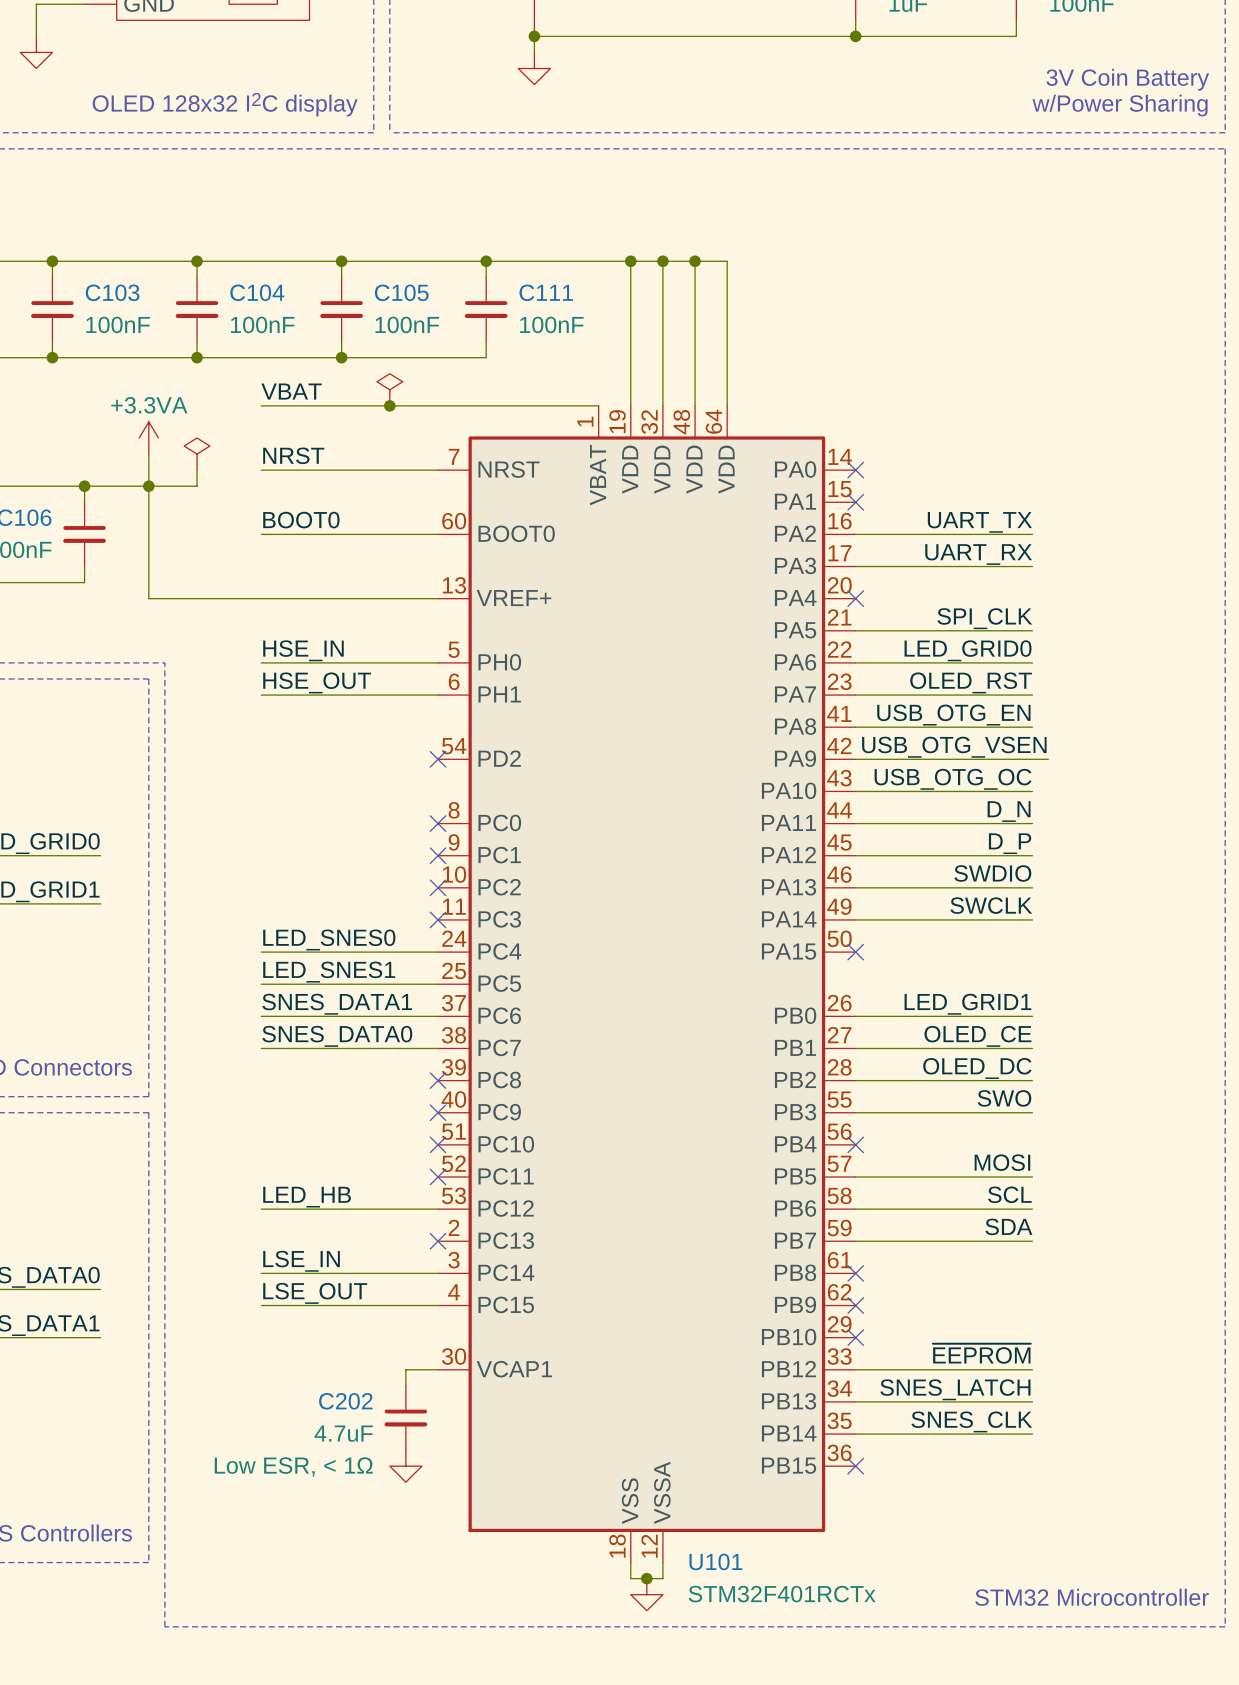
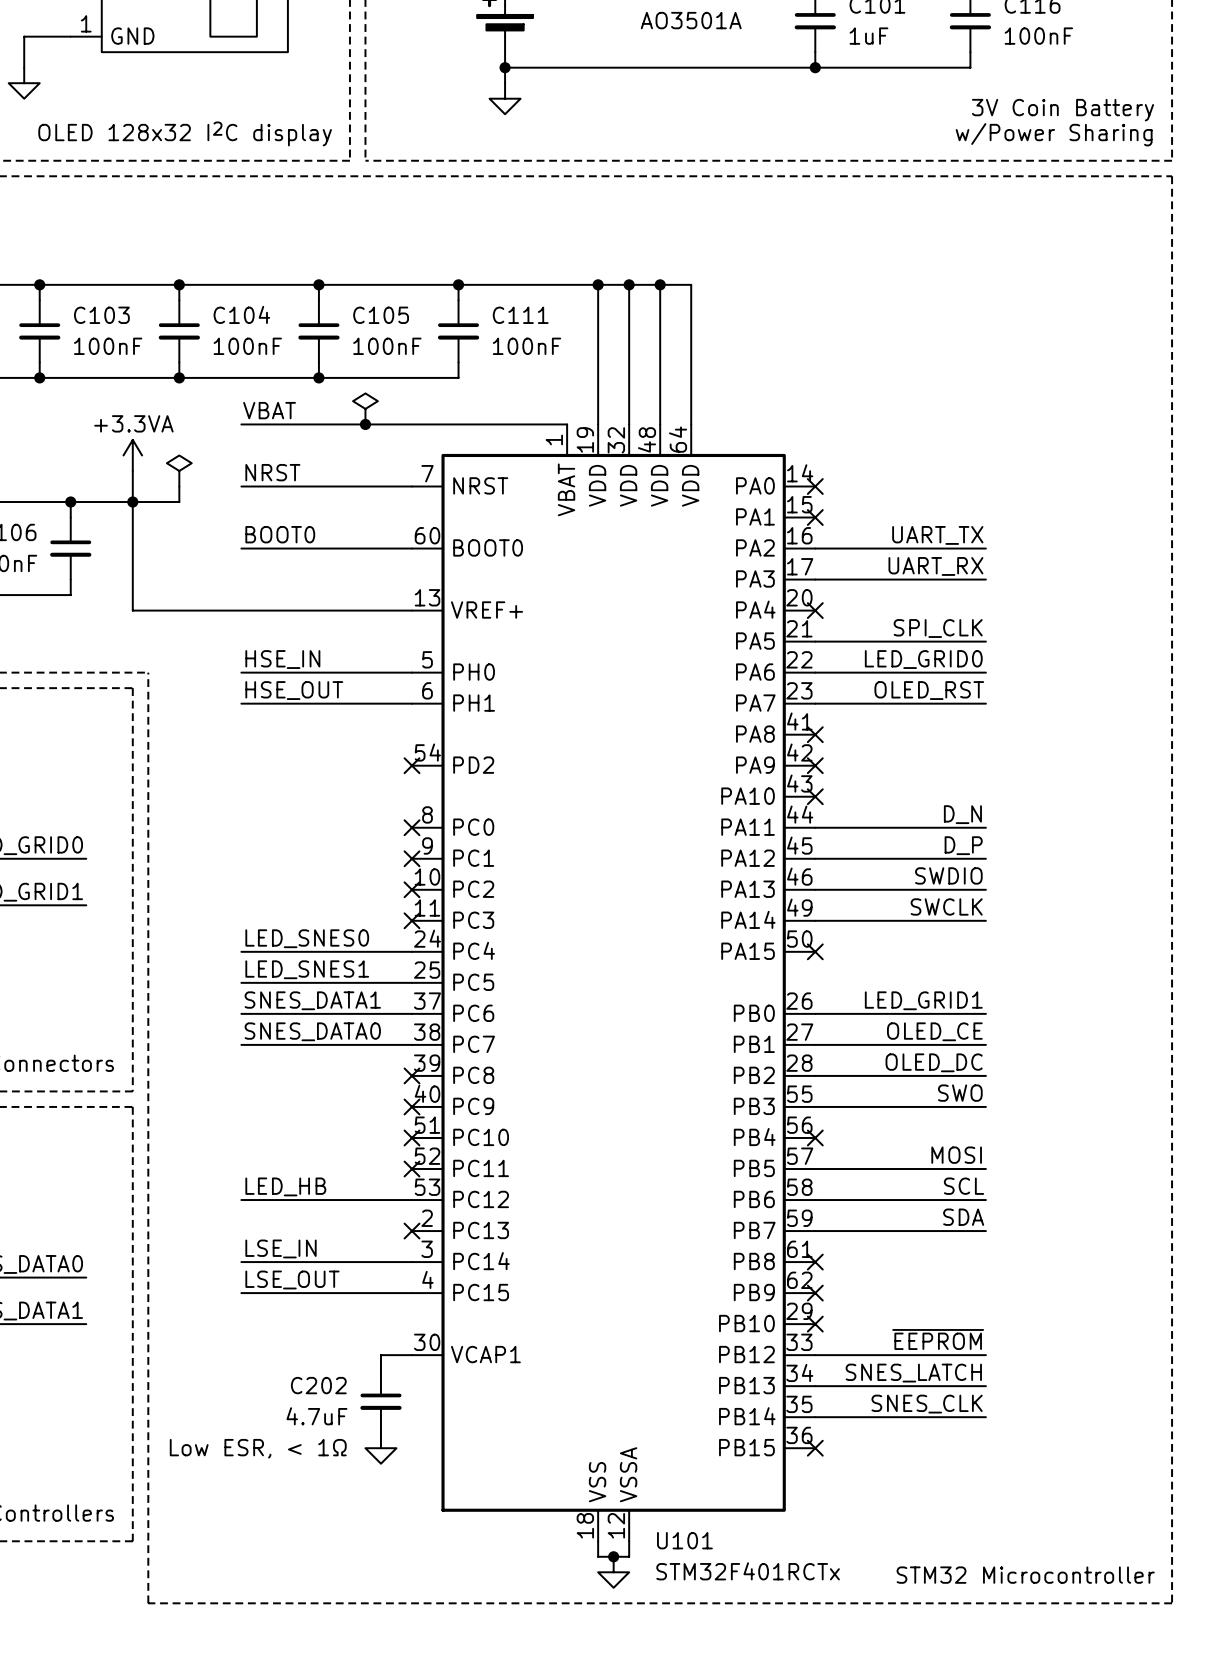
label: USB_OTG_EN (953, 715) -> none
wire: (855, 727) (1032, 727) -> none
no-connect mark: none -> (815, 734)
label: USB_OTG_VSEN (954, 747) -> none
wire: (855, 759) (1048, 759) -> none
no-connect mark: none -> (815, 765)
label: USB_OTG_OC (953, 779) -> none
wire: (855, 791) (1032, 791) -> none
no-connect mark: none -> (815, 796)

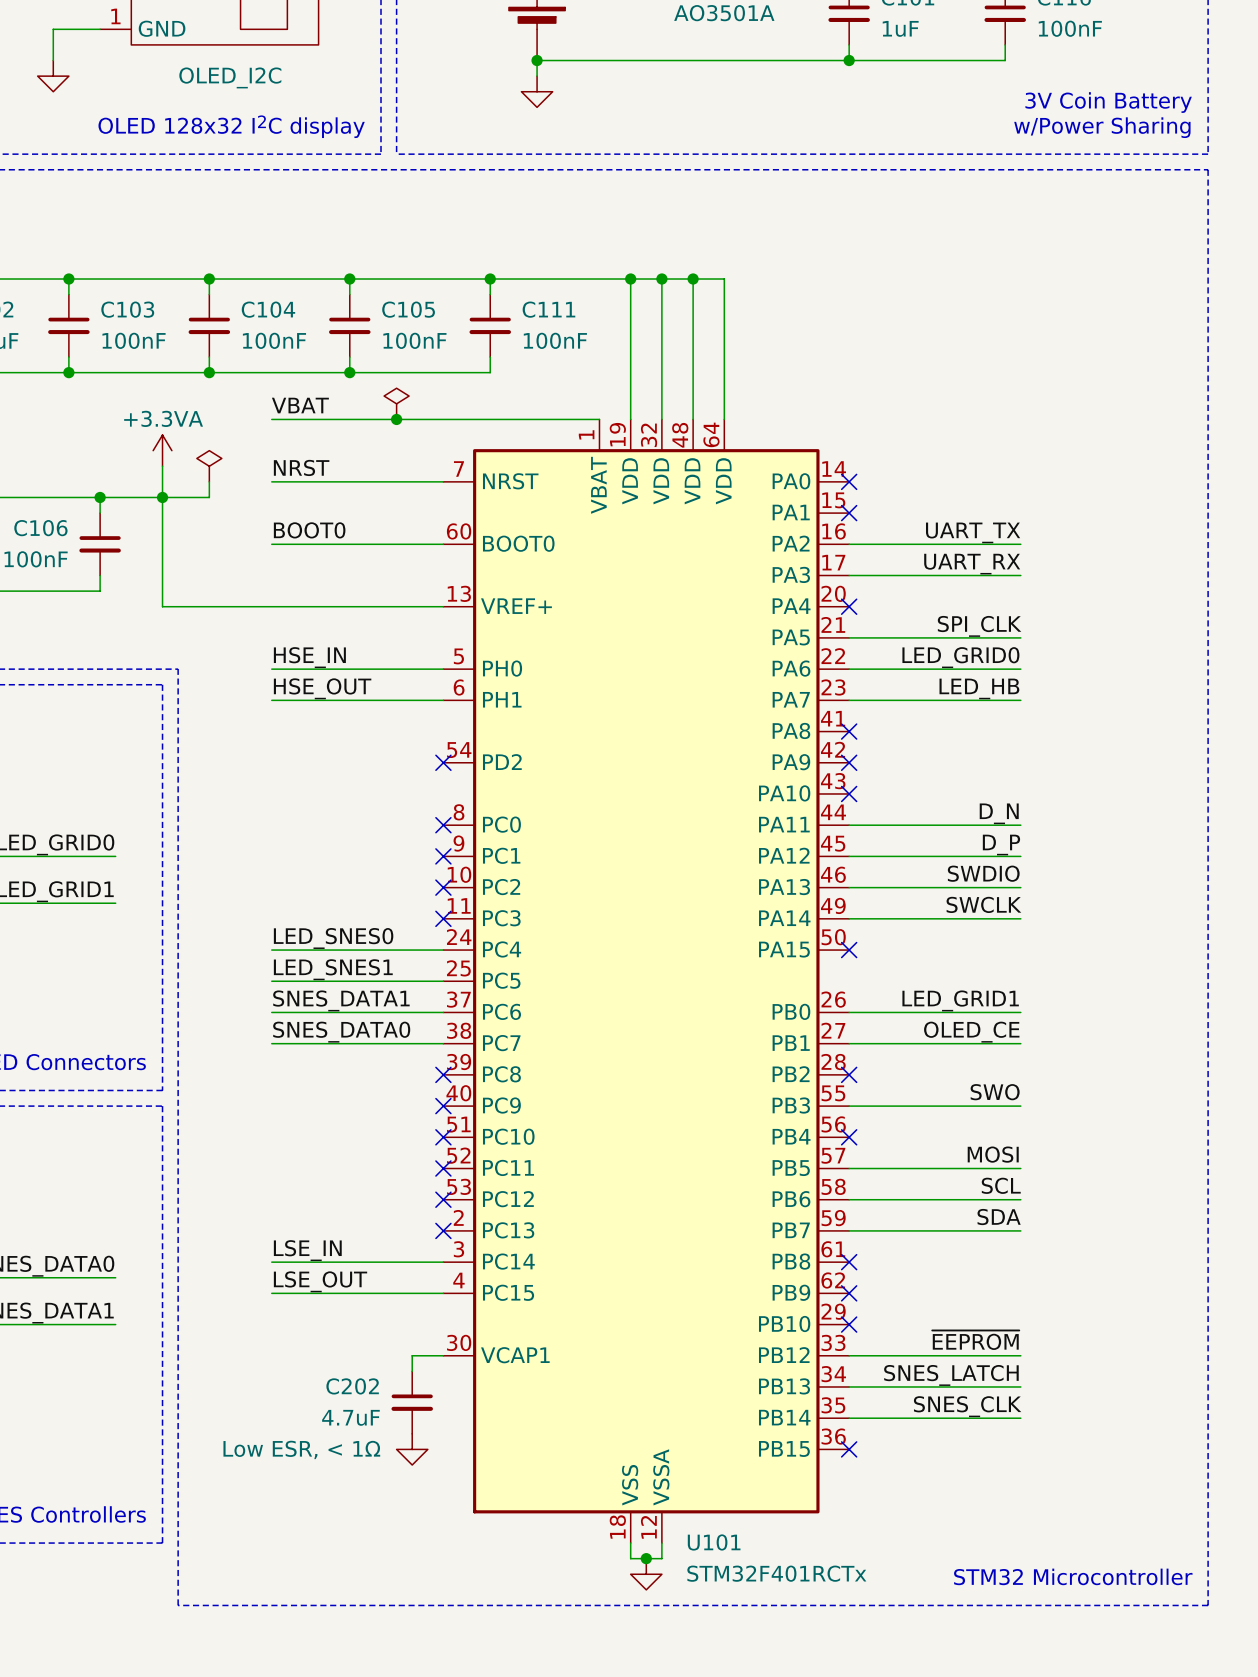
part value: none -> OLED_I2C (230, 77)
label: OLED_RST (929, 690) -> LED_HB (979, 688)
label: OLED_DC (934, 1062) -> none
wire: (815, 1075) (985, 1075) -> none
no-connect mark: none -> (849, 1074)
label: LED_HB (285, 1186) -> none
wire: (241, 1200) (412, 1200) -> none
no-connect mark: none -> (443, 1199)

